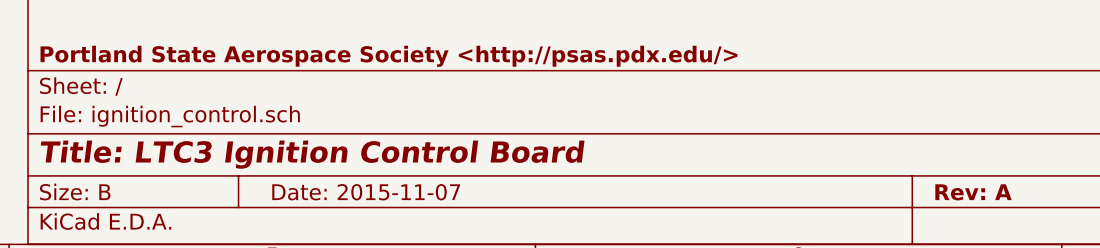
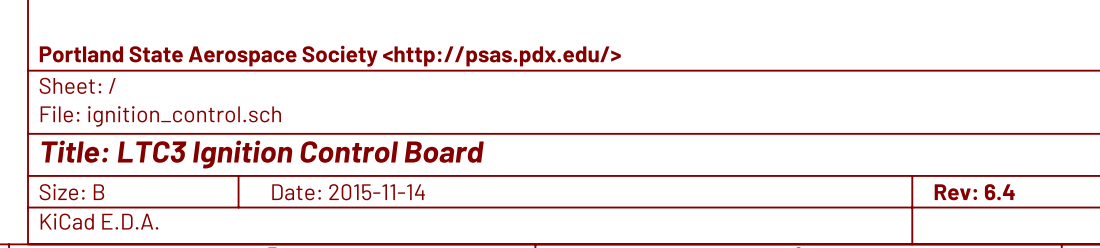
title block: Date: 2015-11-07 (366, 192) -> Date: 2015-11-14 (348, 192)
title block: Rev: A (973, 192) -> Rev: 6.4 (974, 192)

